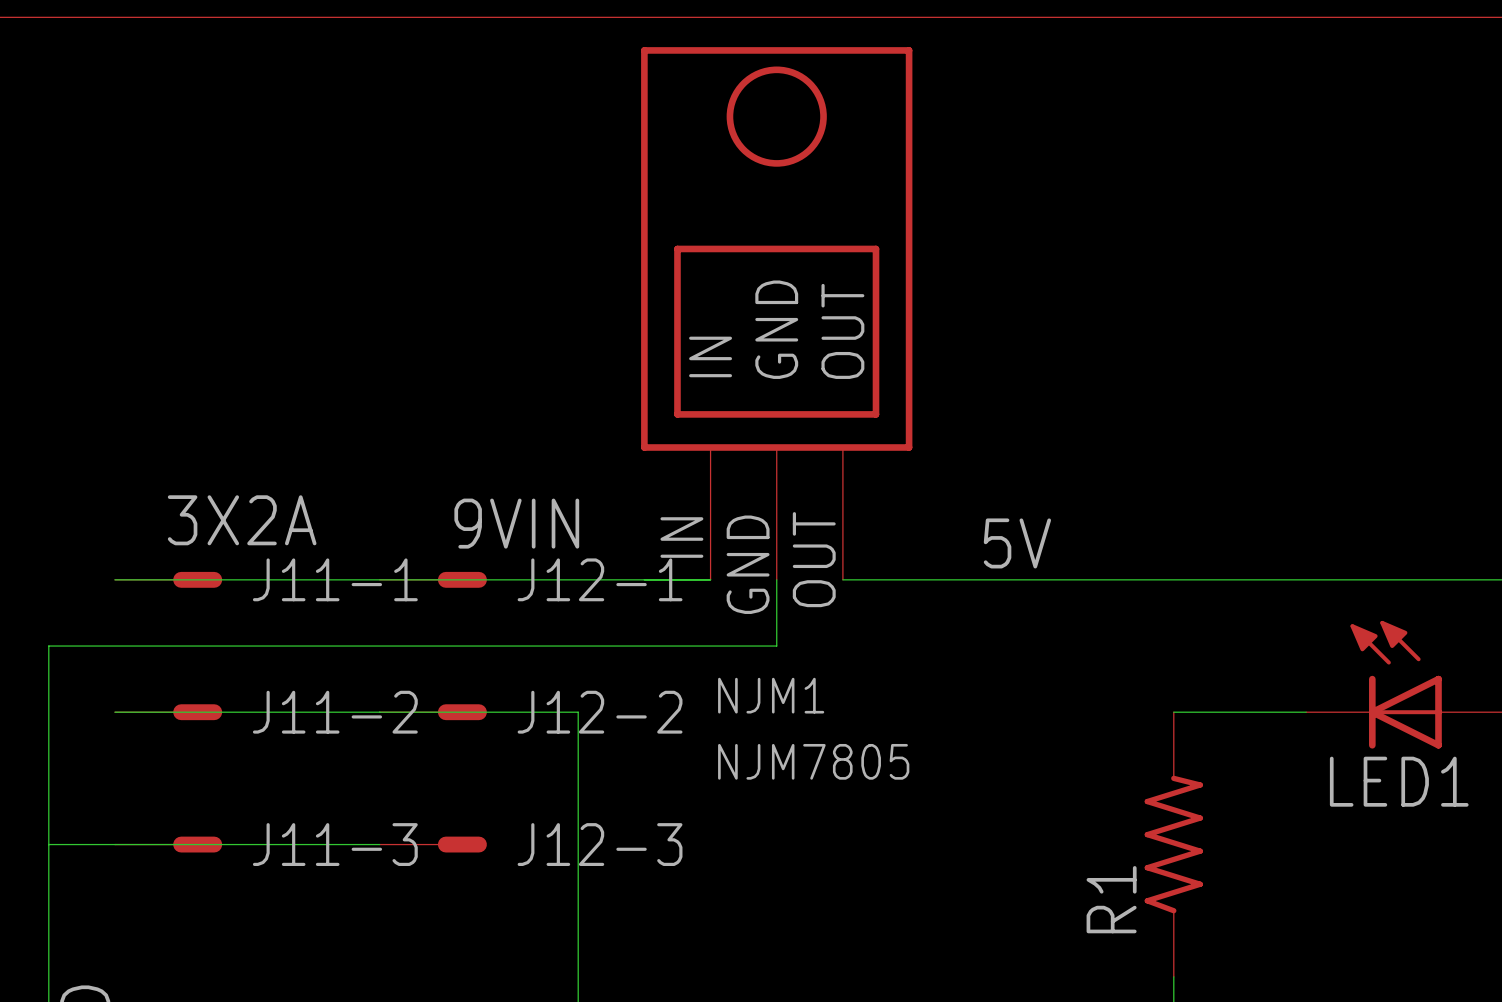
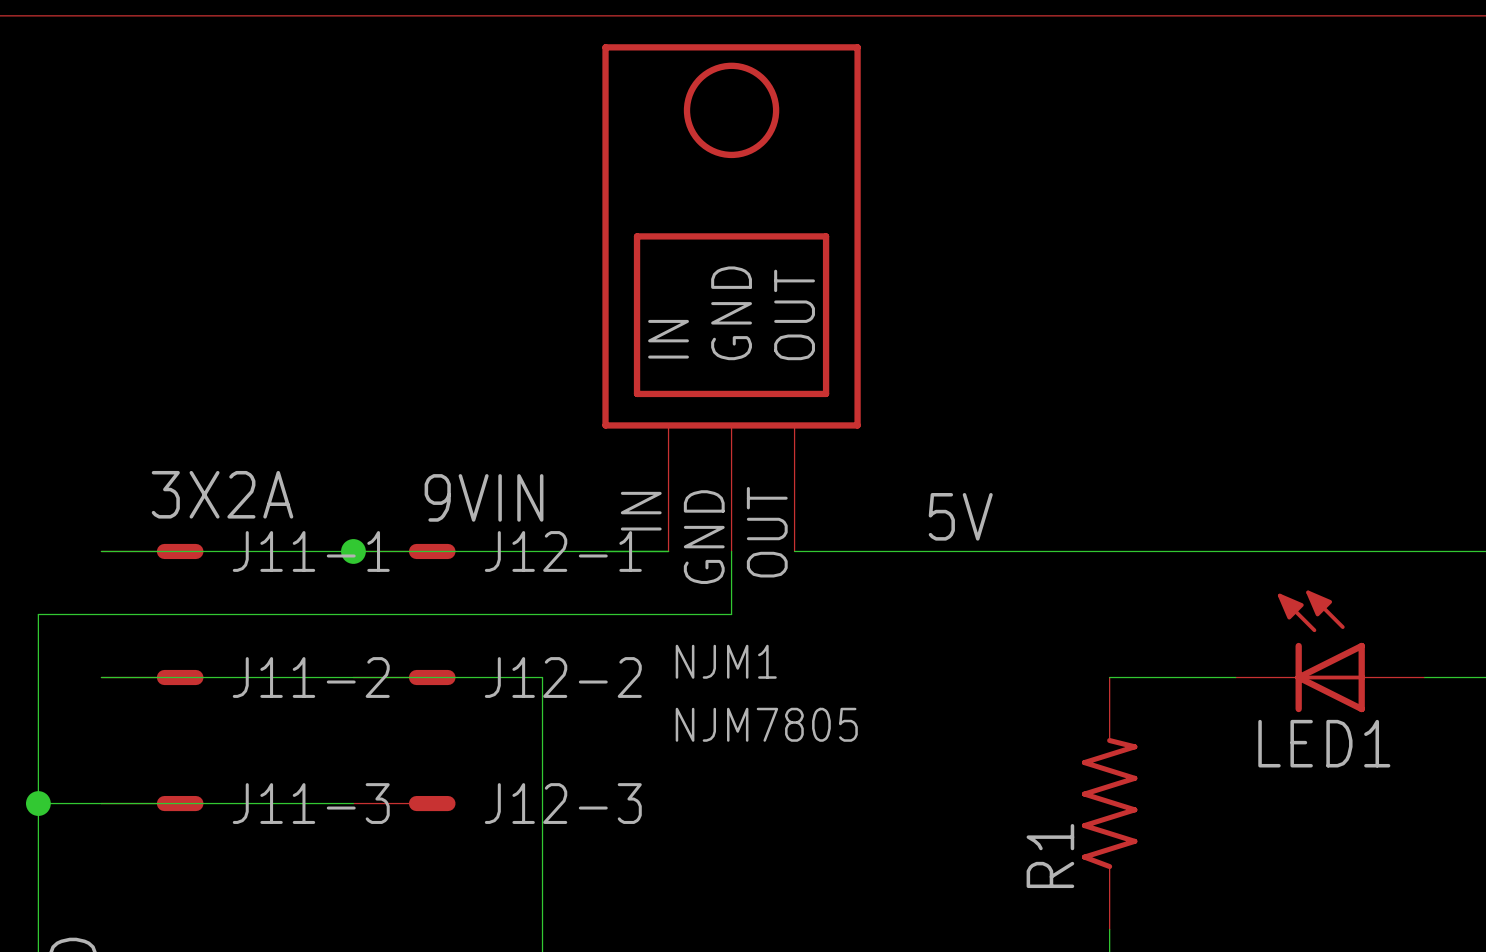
junction: none -> (353, 551)
junction: none -> (38, 803)

